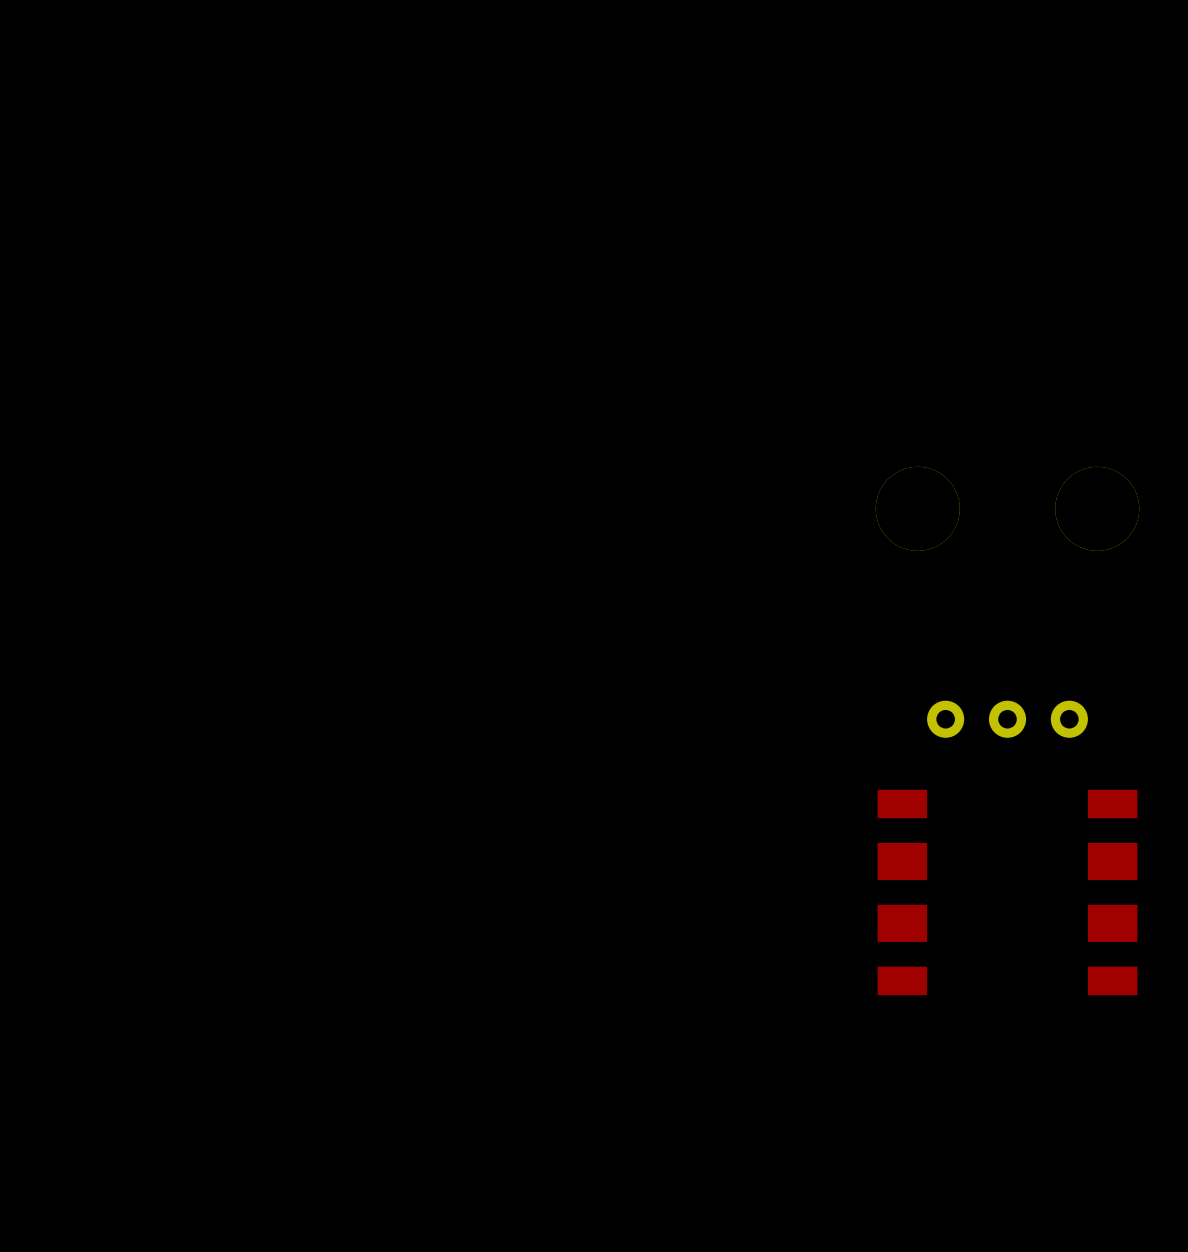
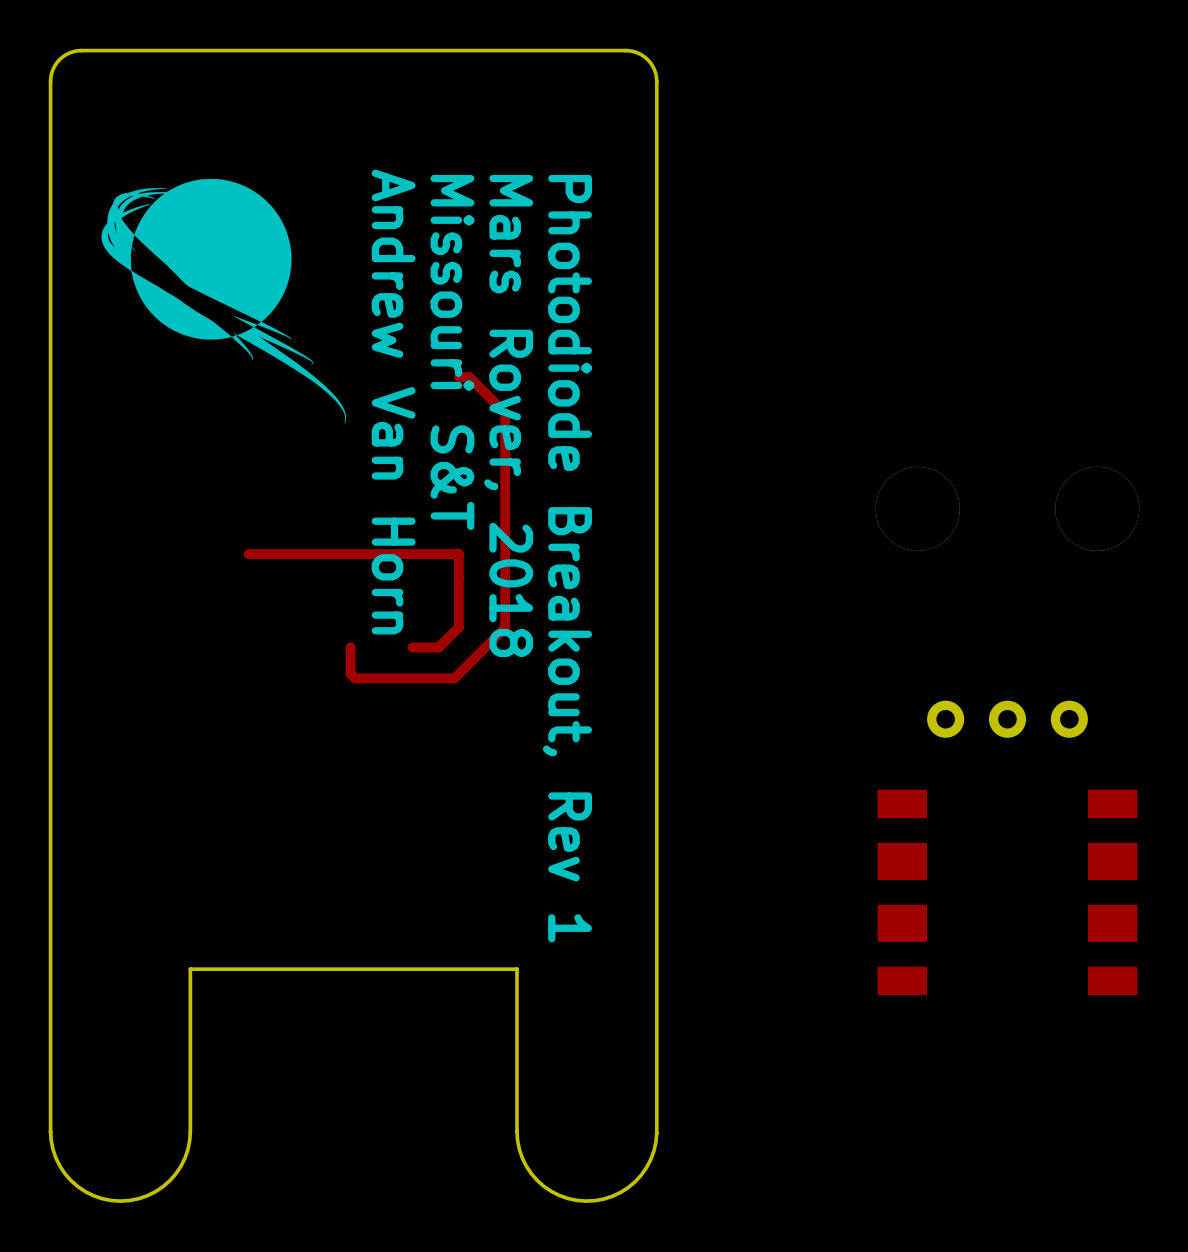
drawing: none -> [101, 178, 347, 424]
text: none -> Missouri S&T (452, 352)
text: none -> Mars Rover, 2018 (508, 415)
text: none -> Andrew Van Horn (393, 402)
top track: none -> (458, 377) (469, 377) (505, 413) (505, 627) (454, 678) (355, 678) (350, 673) (350, 647)
text: none -> Photodiode Breakout, Rev 1 (567, 558)
top track: none -> (248, 554) (458, 554) (458, 627) (438, 647) (412, 647)
board edge: none -> (50, 1131) (51, 1140) (52, 1149) (59, 1166) (77, 1186) (93, 1195) (120, 1201) (138, 1198) (163, 1186) (175, 1173) (185, 1157) (189, 1140) (190, 969) (516, 969) (516, 1131) (519, 1149) (526, 1165) (537, 1180) (551, 1191) (568, 1198) (585, 1201) (603, 1199) (620, 1192) (635, 1181) (646, 1167) (653, 1150) (656, 1133) (656, 81) (652, 66) (641, 54) (625, 50) (81, 50) (66, 54) (54, 66) (50, 81) (50, 1133)

